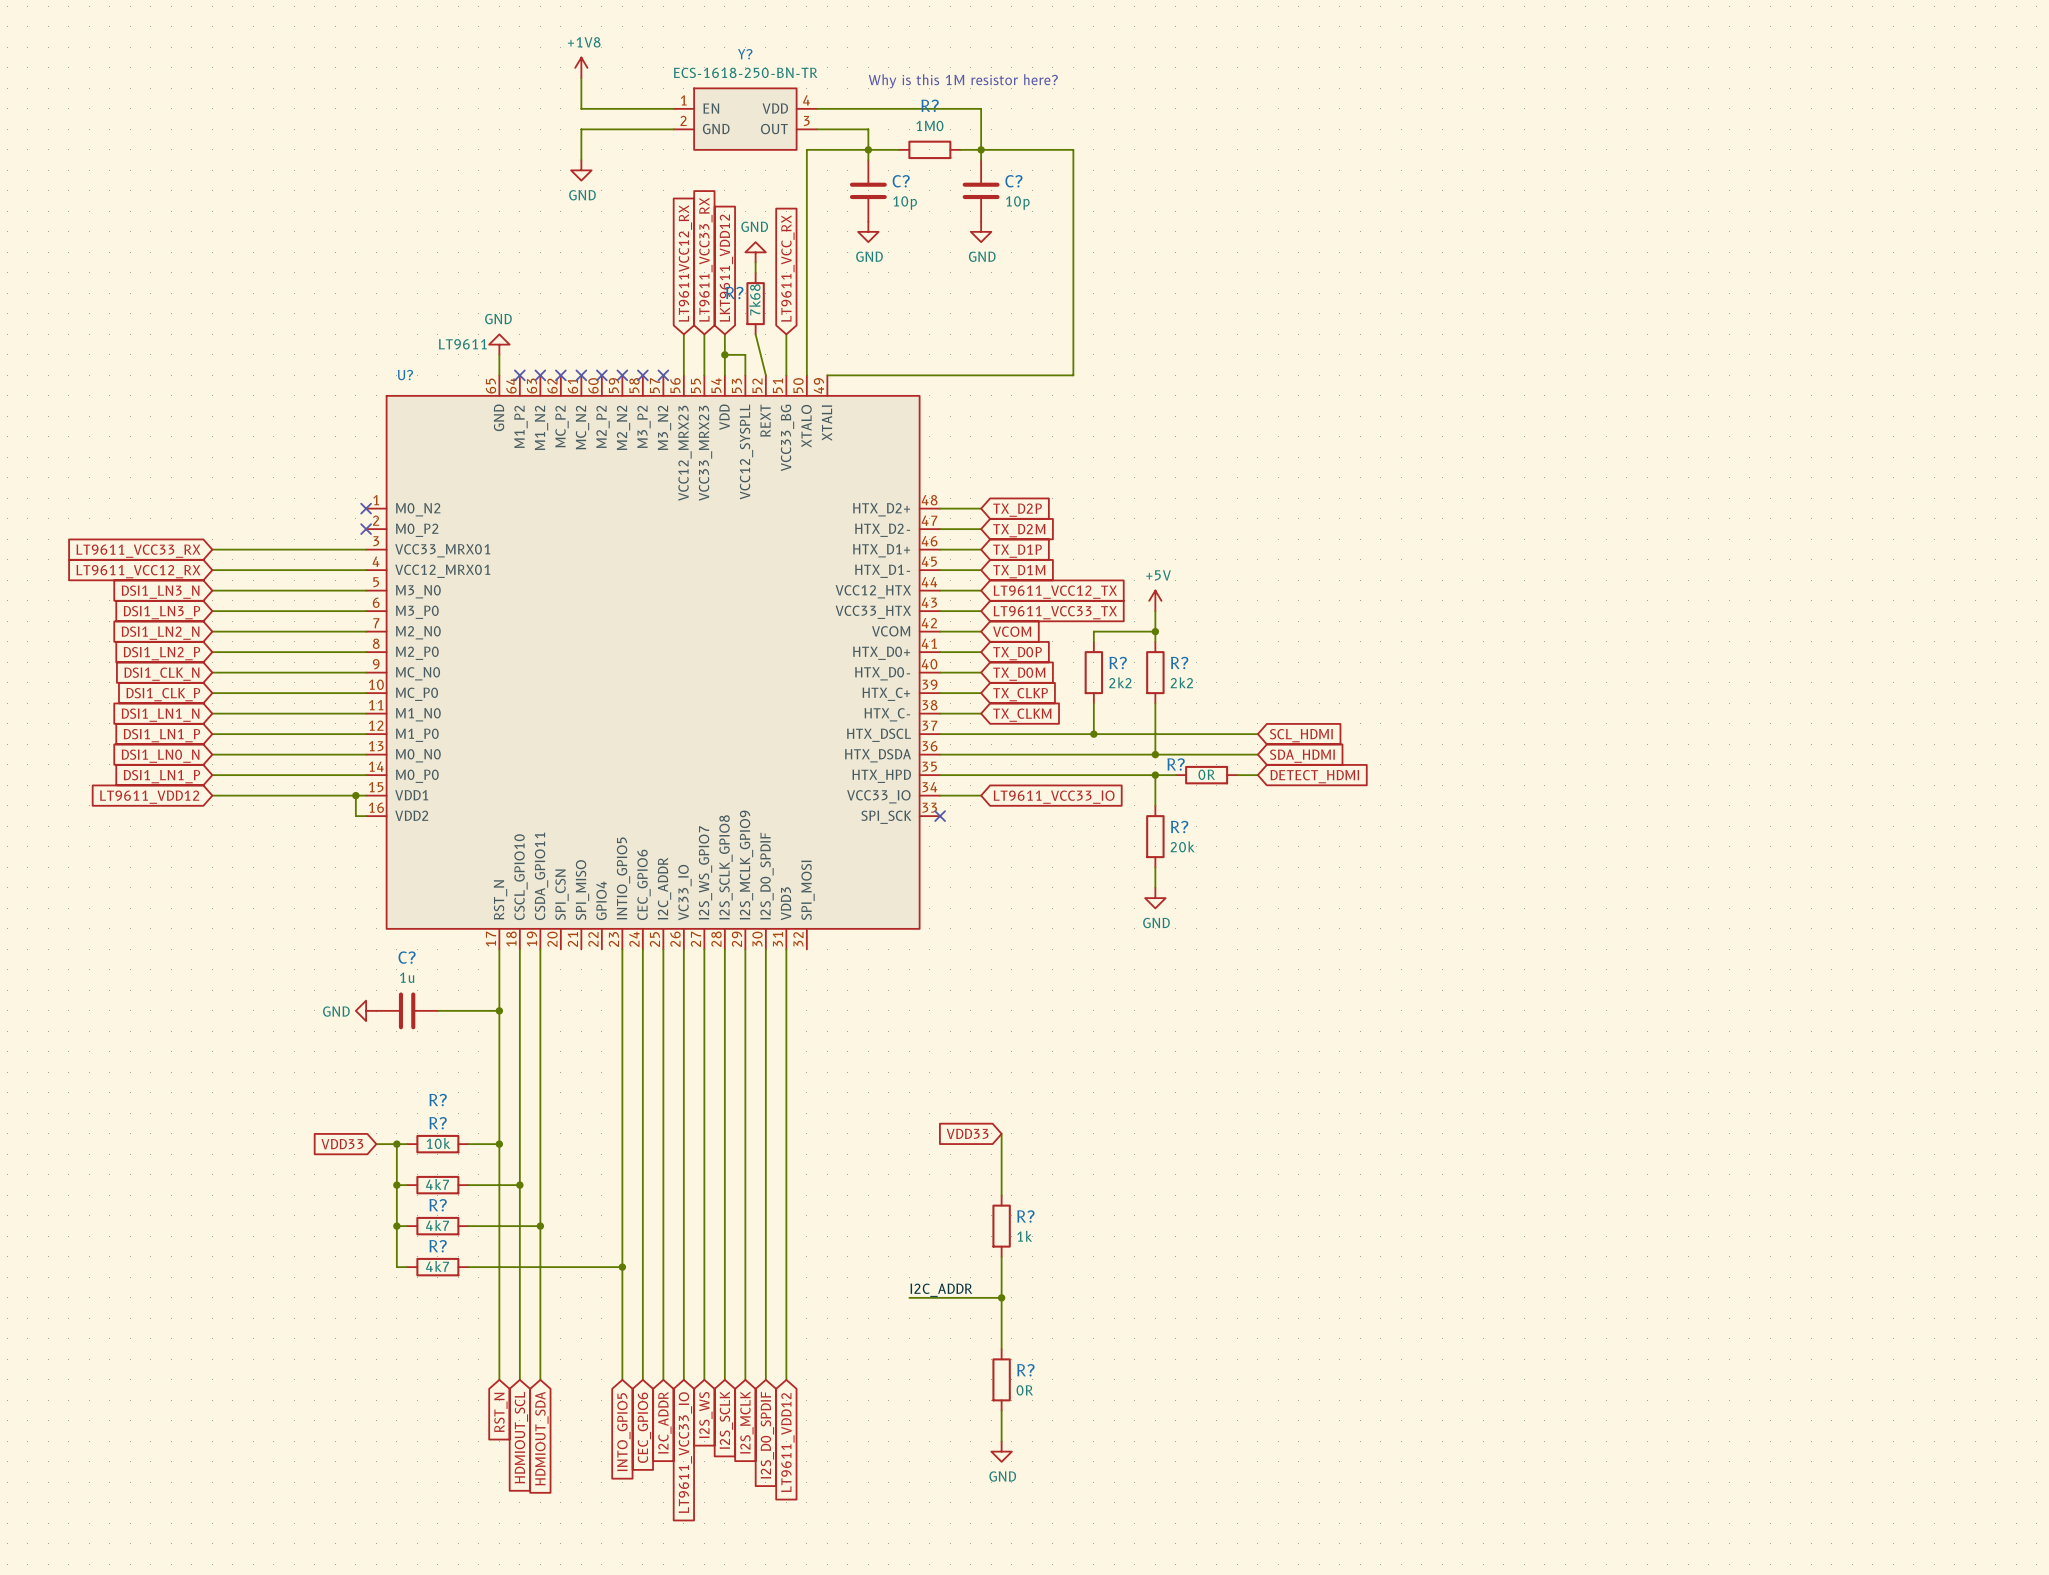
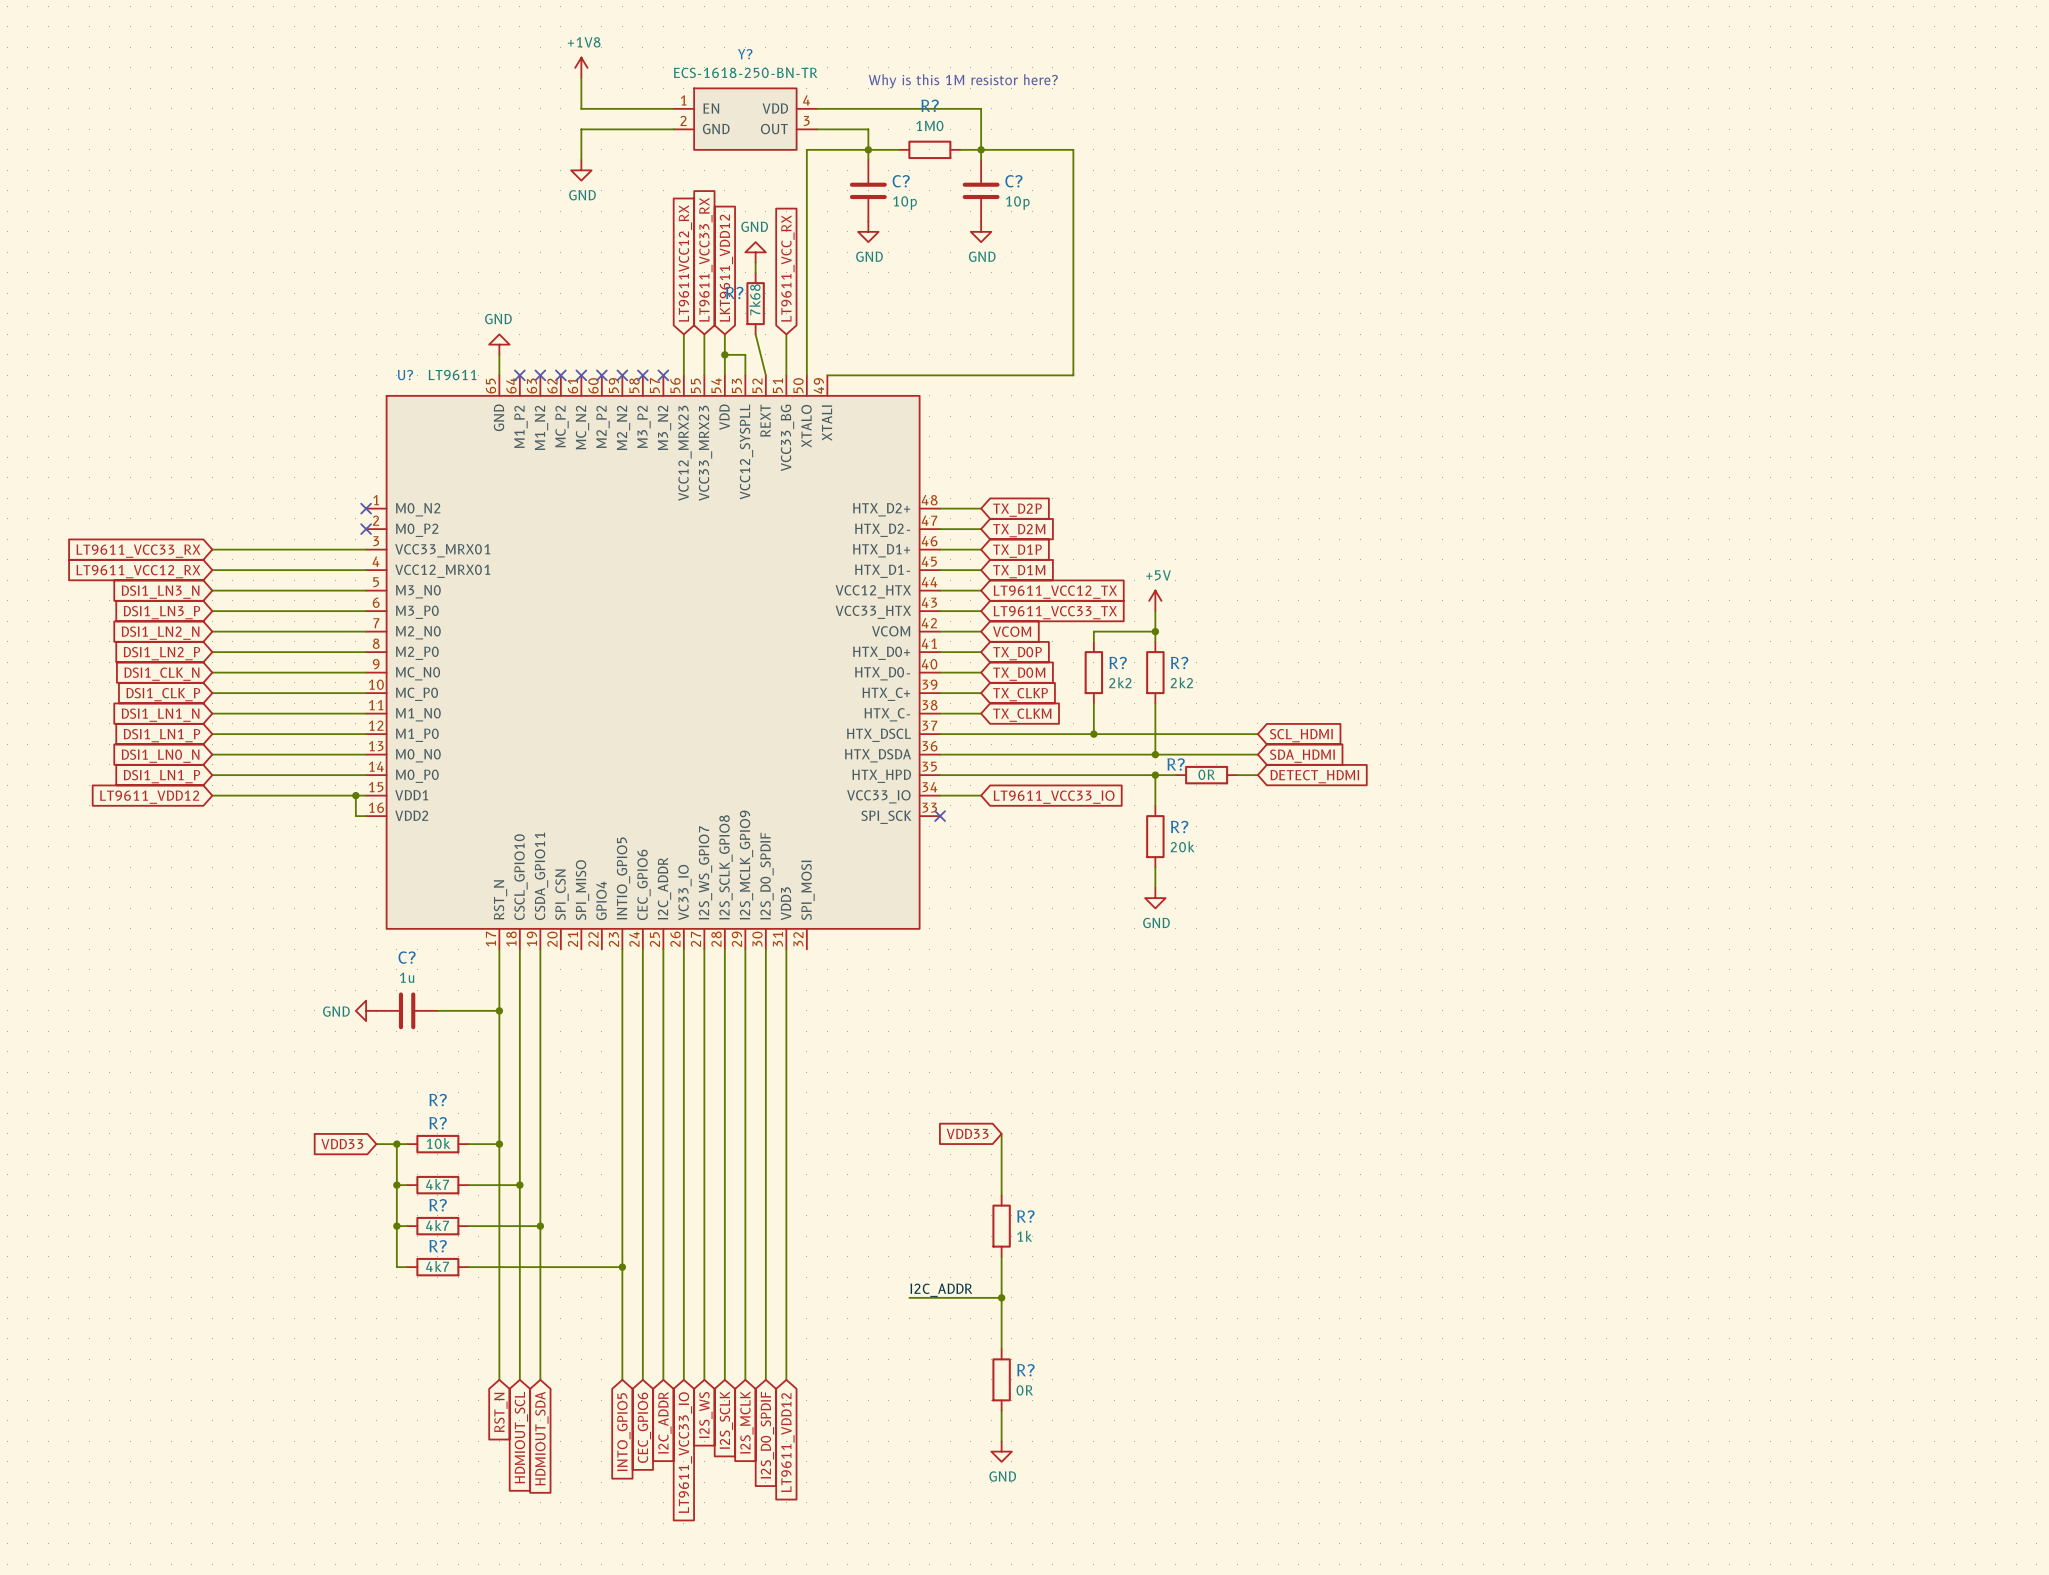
U? value position: LT9611 (462, 344) -> LT9611 (452, 375)

